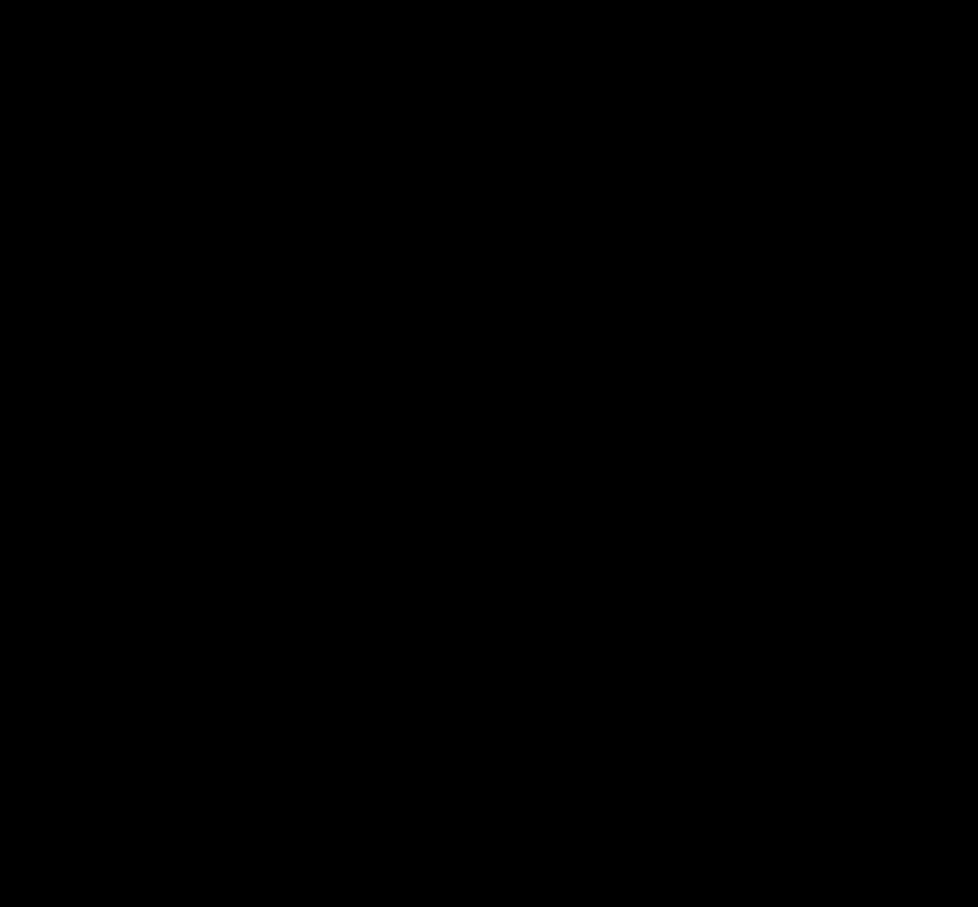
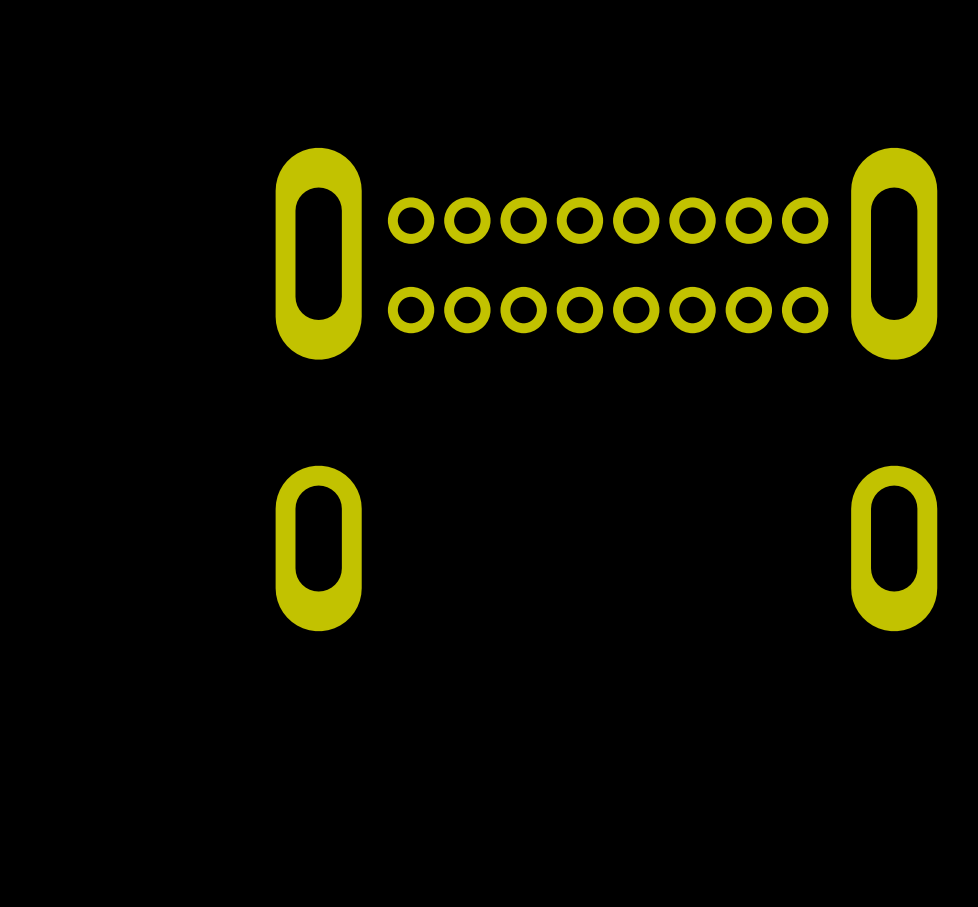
part: none -> (606, 389)

